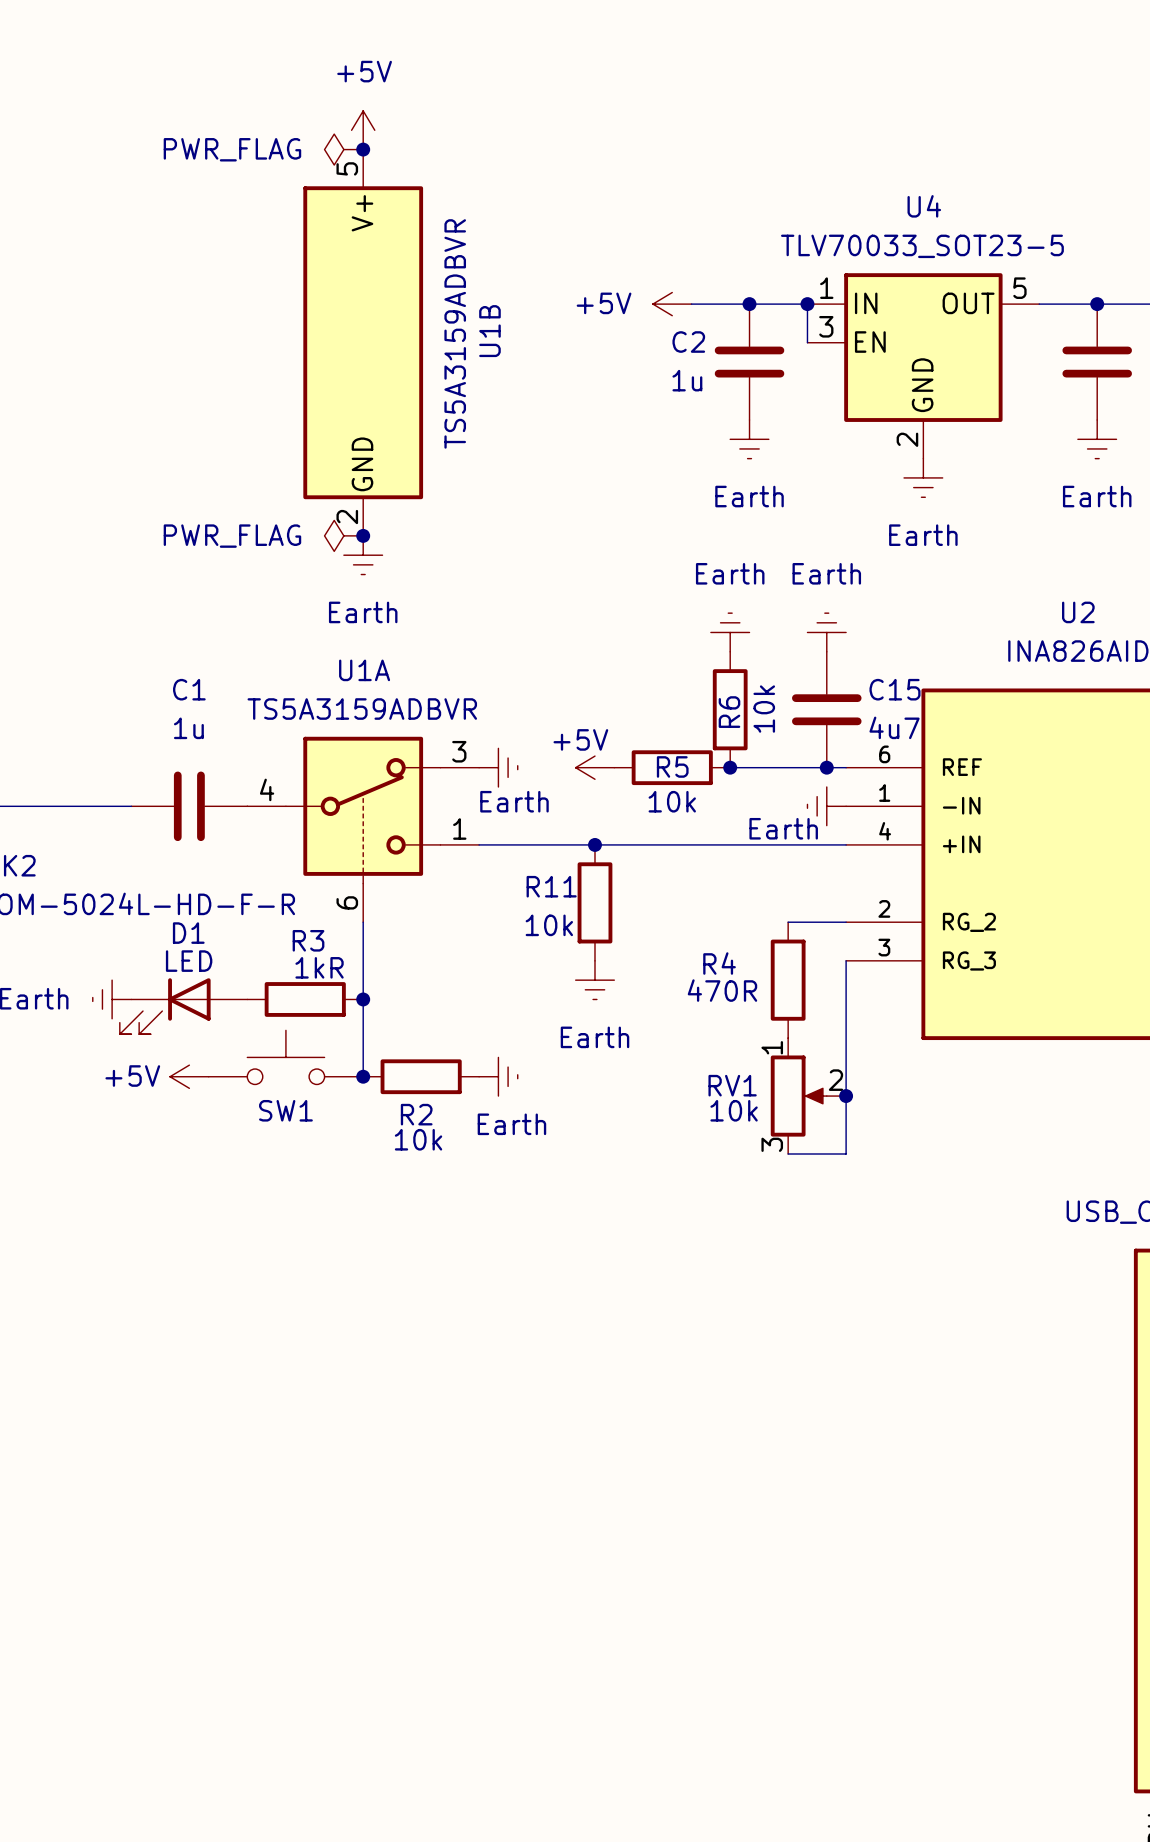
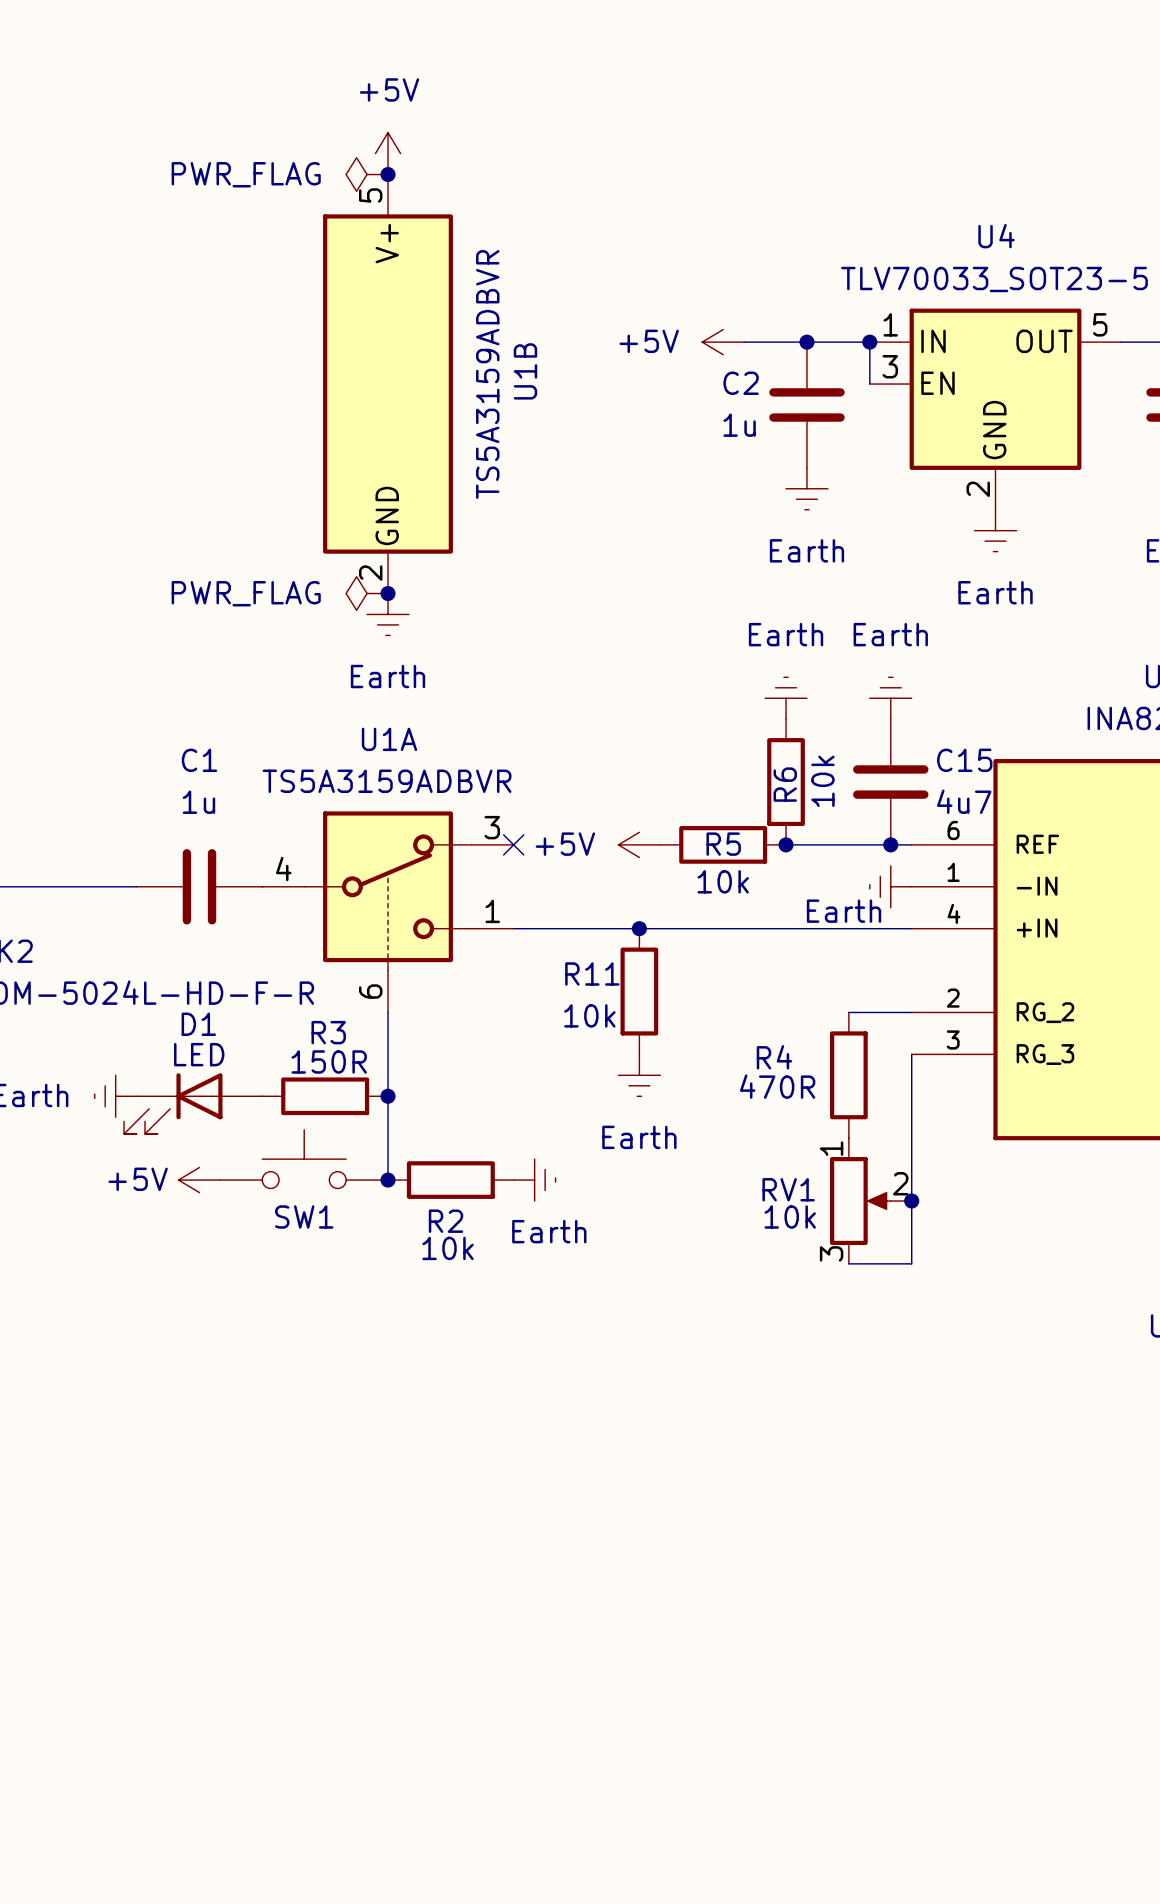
power symbol text position: +5V (580, 739) -> +5V (565, 844)
no-connect mark: none -> (513, 844)
power symbol: Earth (498, 767) -> none
R3 value: 1kR (319, 967) -> 150R (329, 1061)

